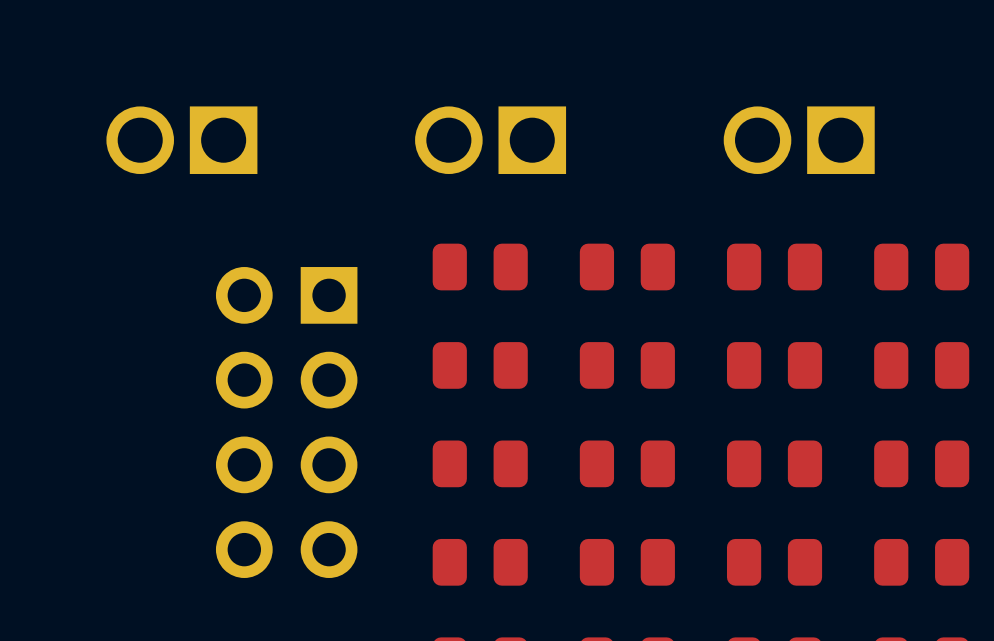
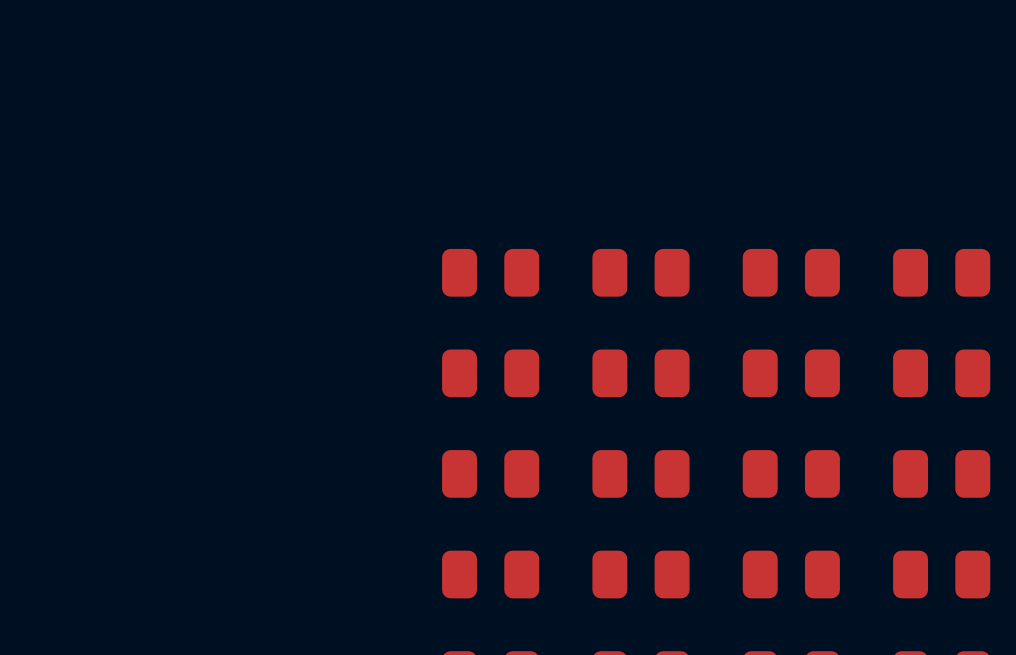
part: (181, 140) -> none
part: (490, 140) -> none
part: (799, 140) -> none
part: (286, 422) -> none

